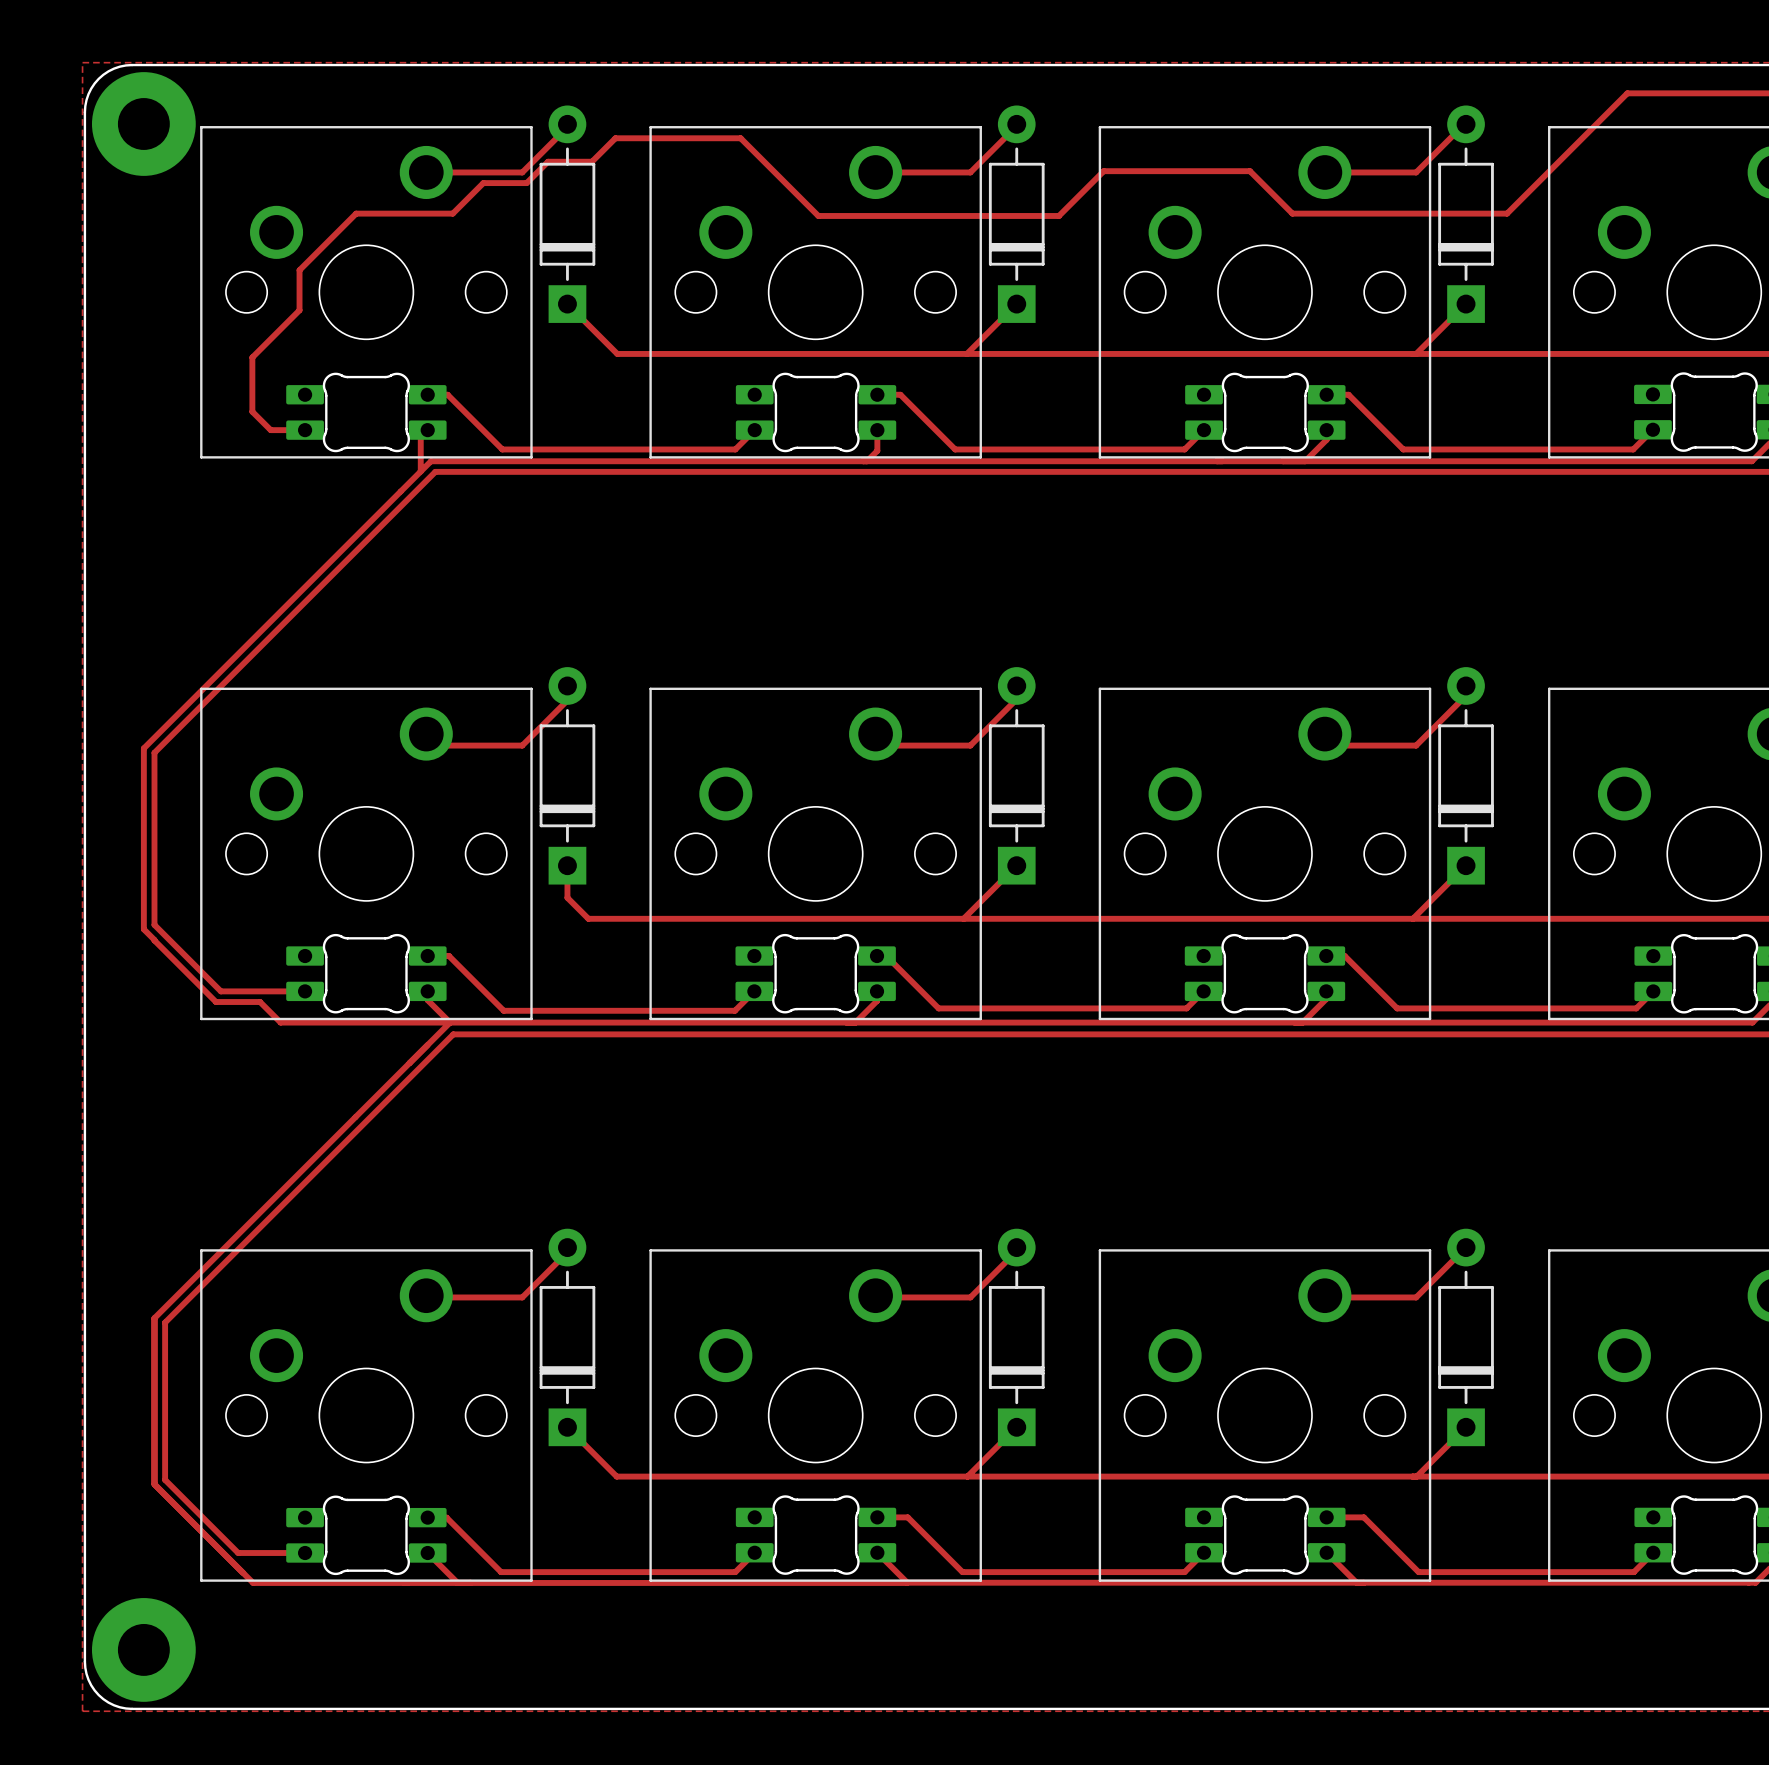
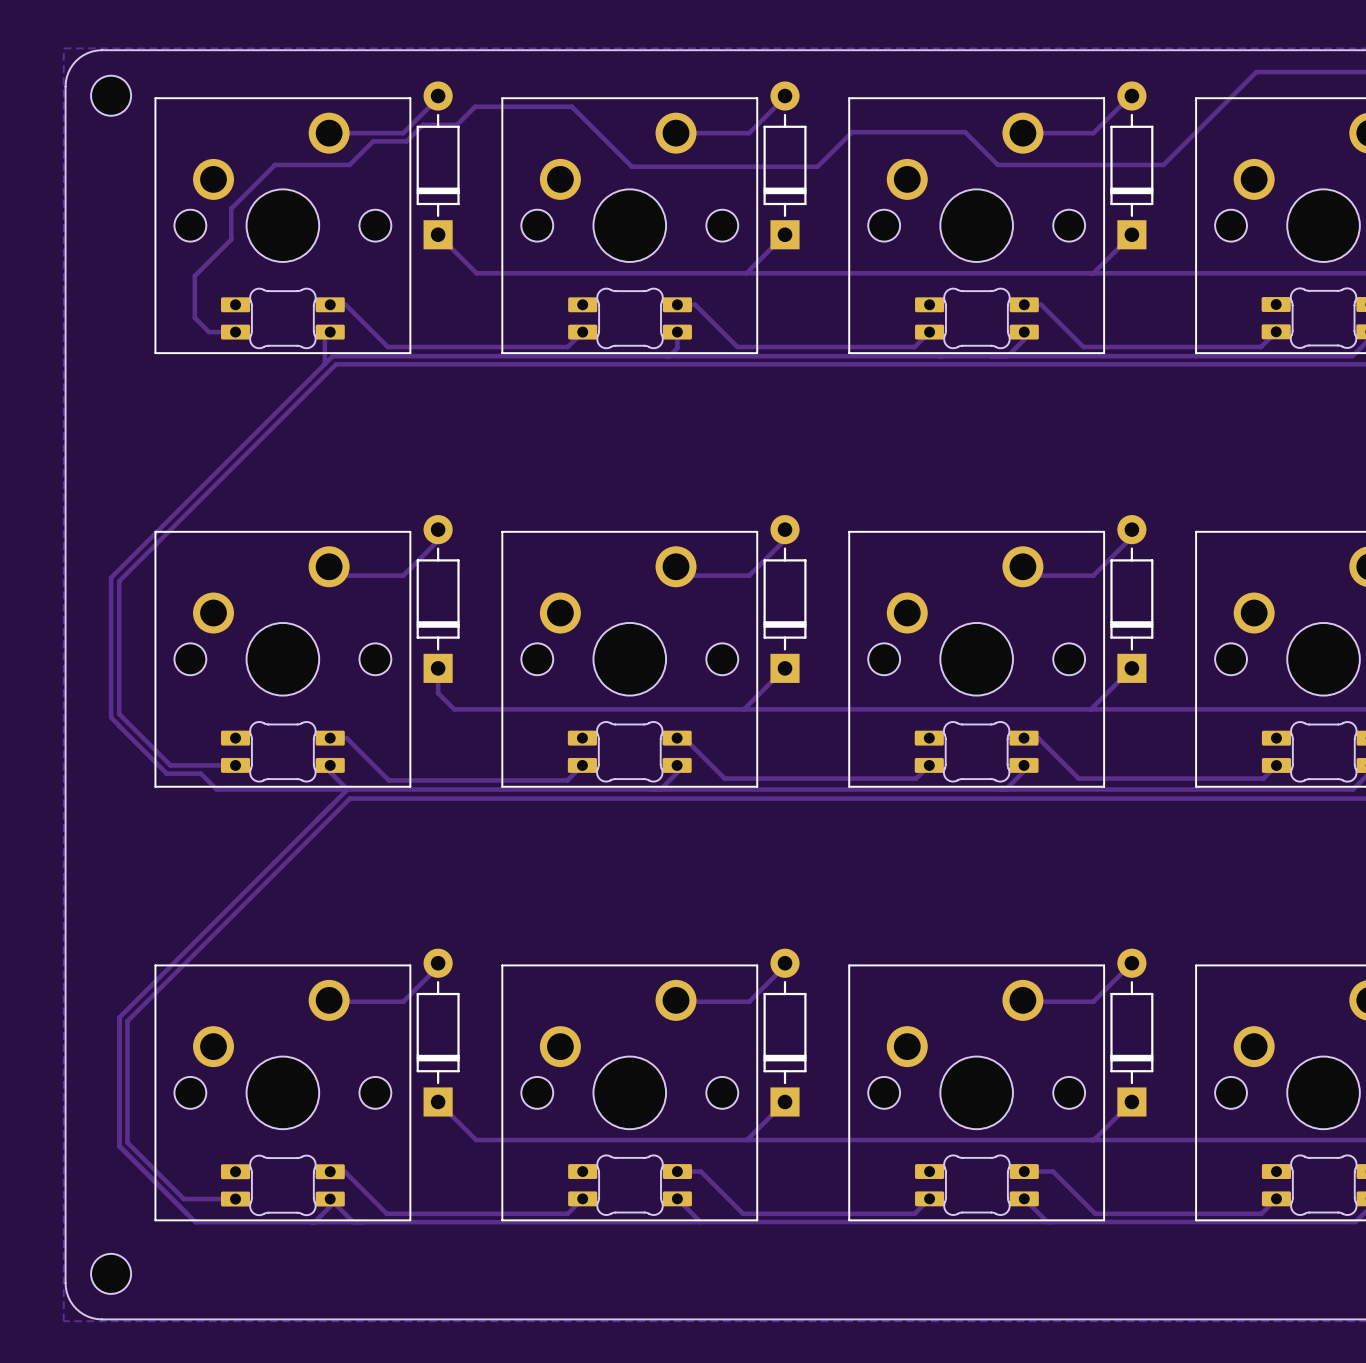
part footprint: [91, 72, 196, 176] -> [91, 75, 132, 116]
track: none -> (330, 1199) (330, 1206) (314, 1222)
part footprint: [91, 1598, 196, 1702] -> [91, 1253, 132, 1294]

